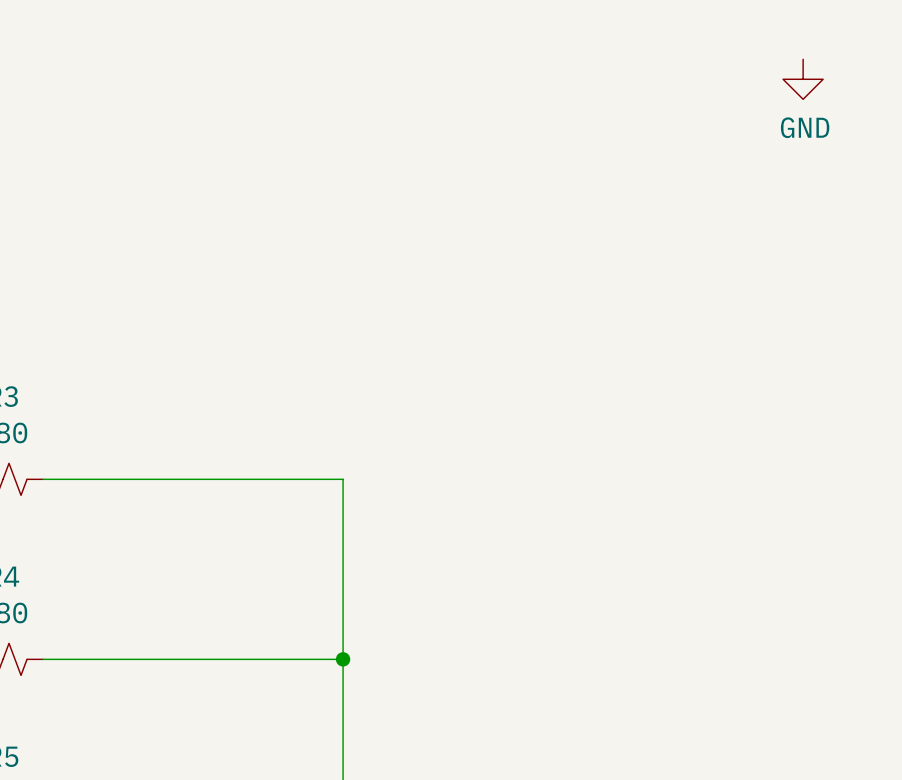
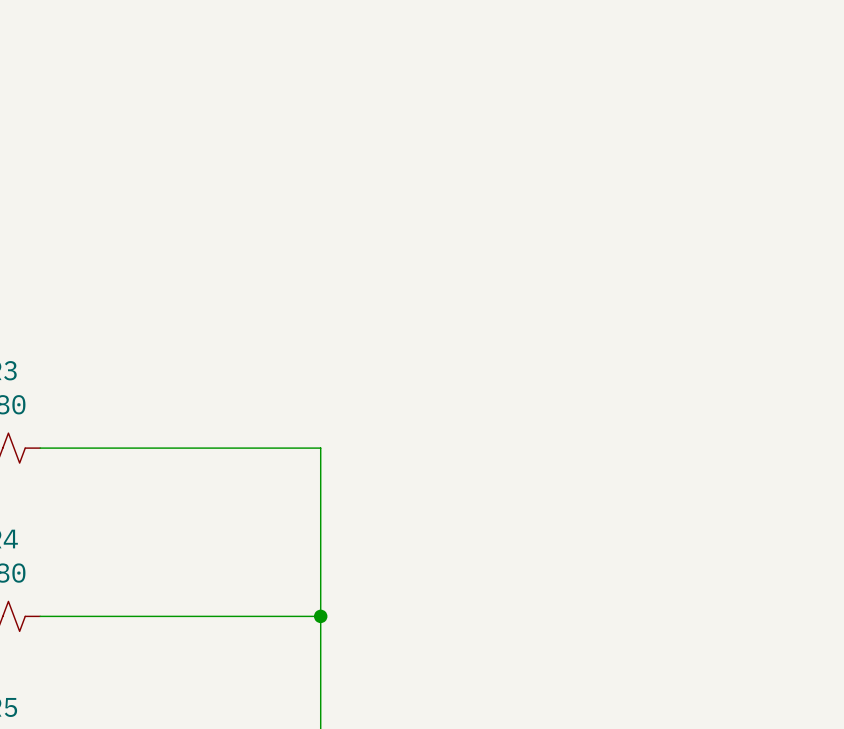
power symbol: GND (803, 79) -> none

